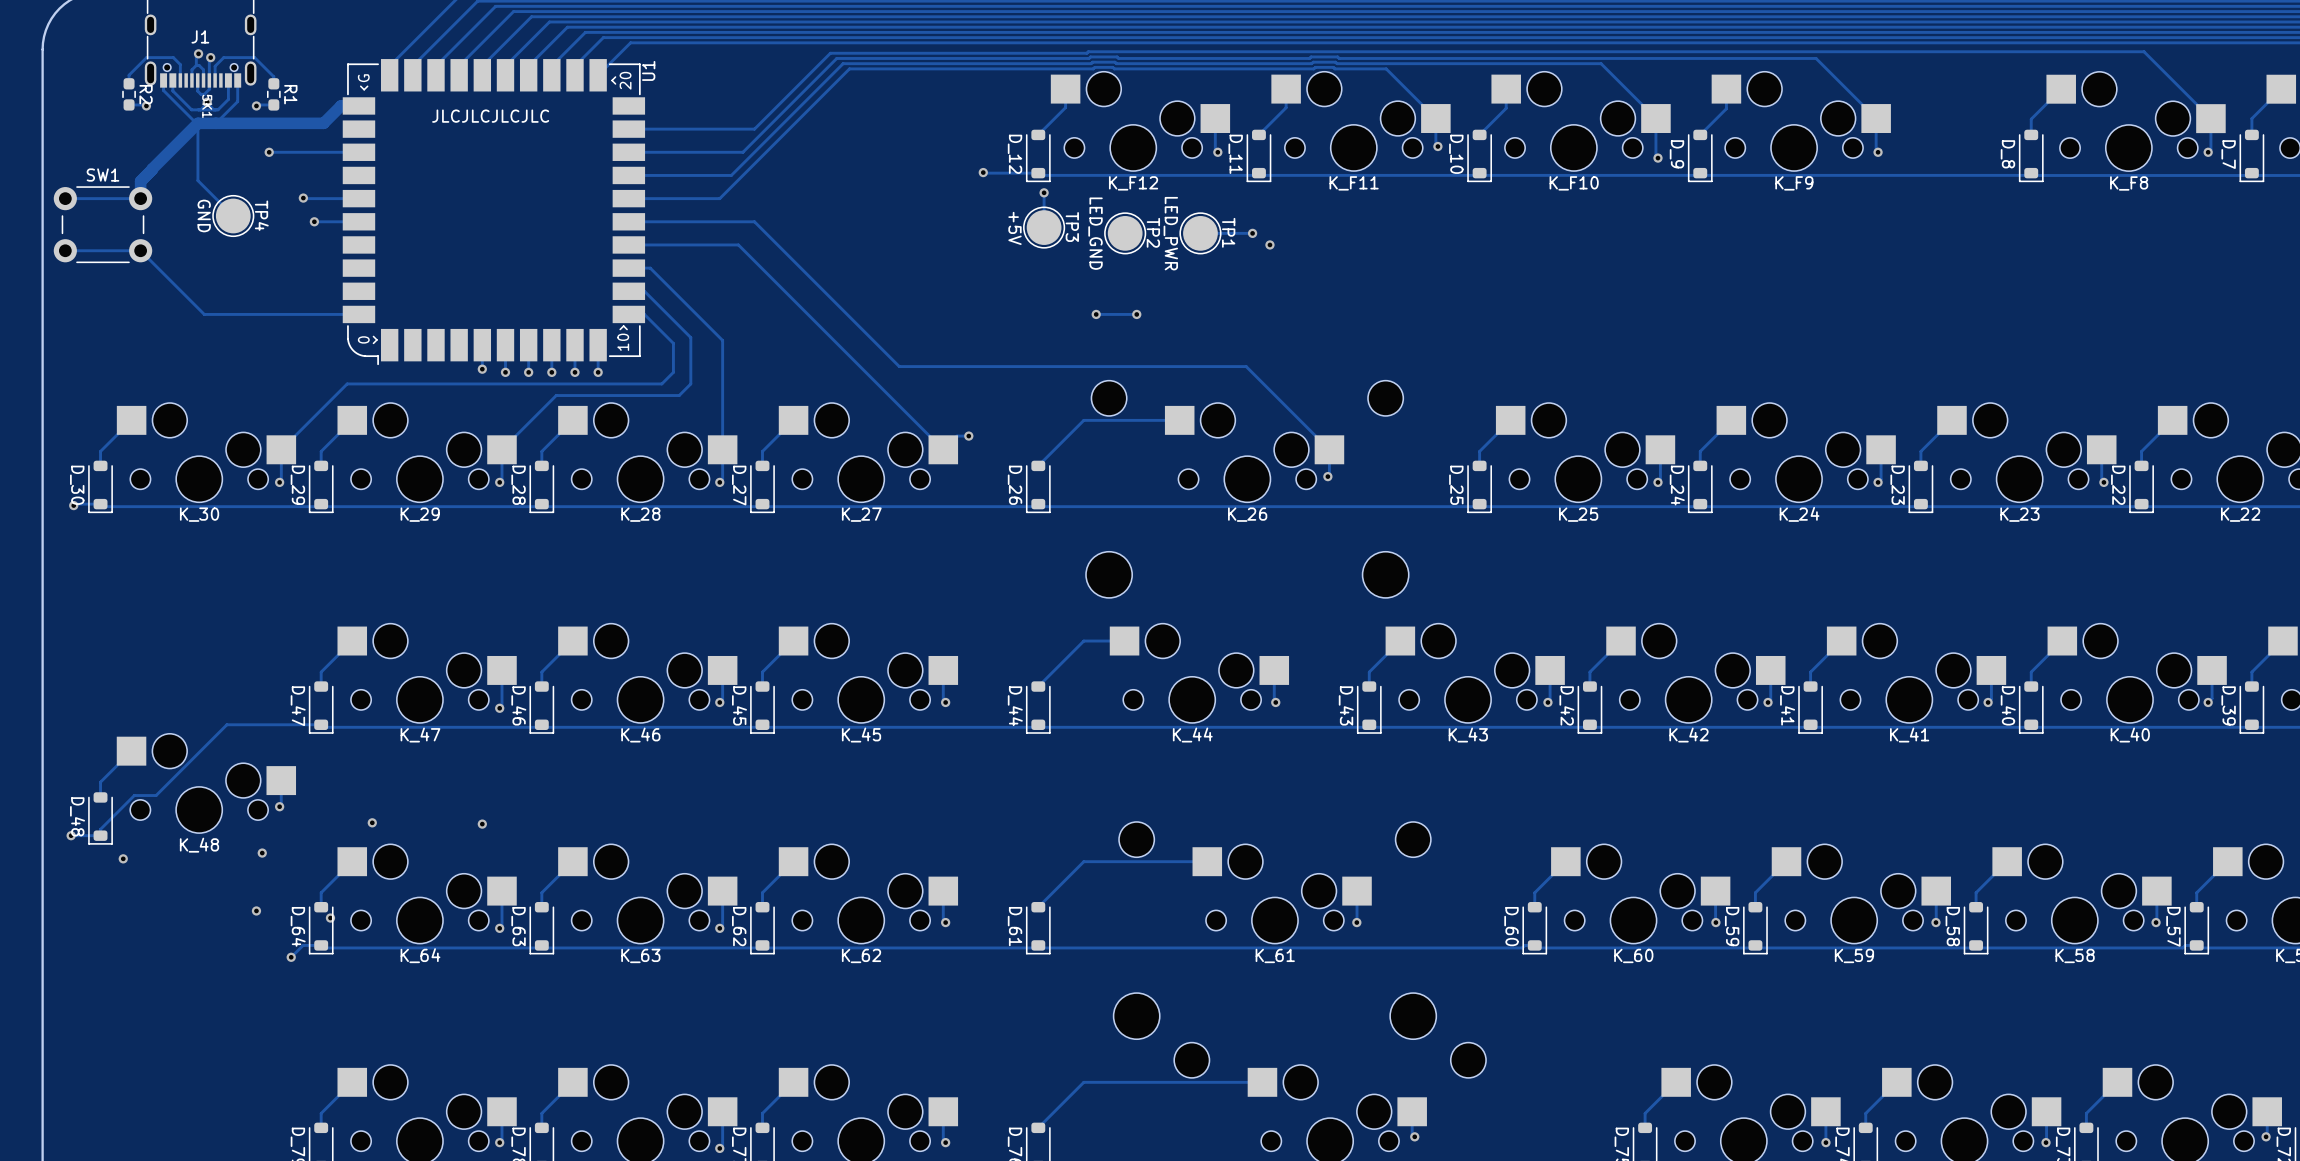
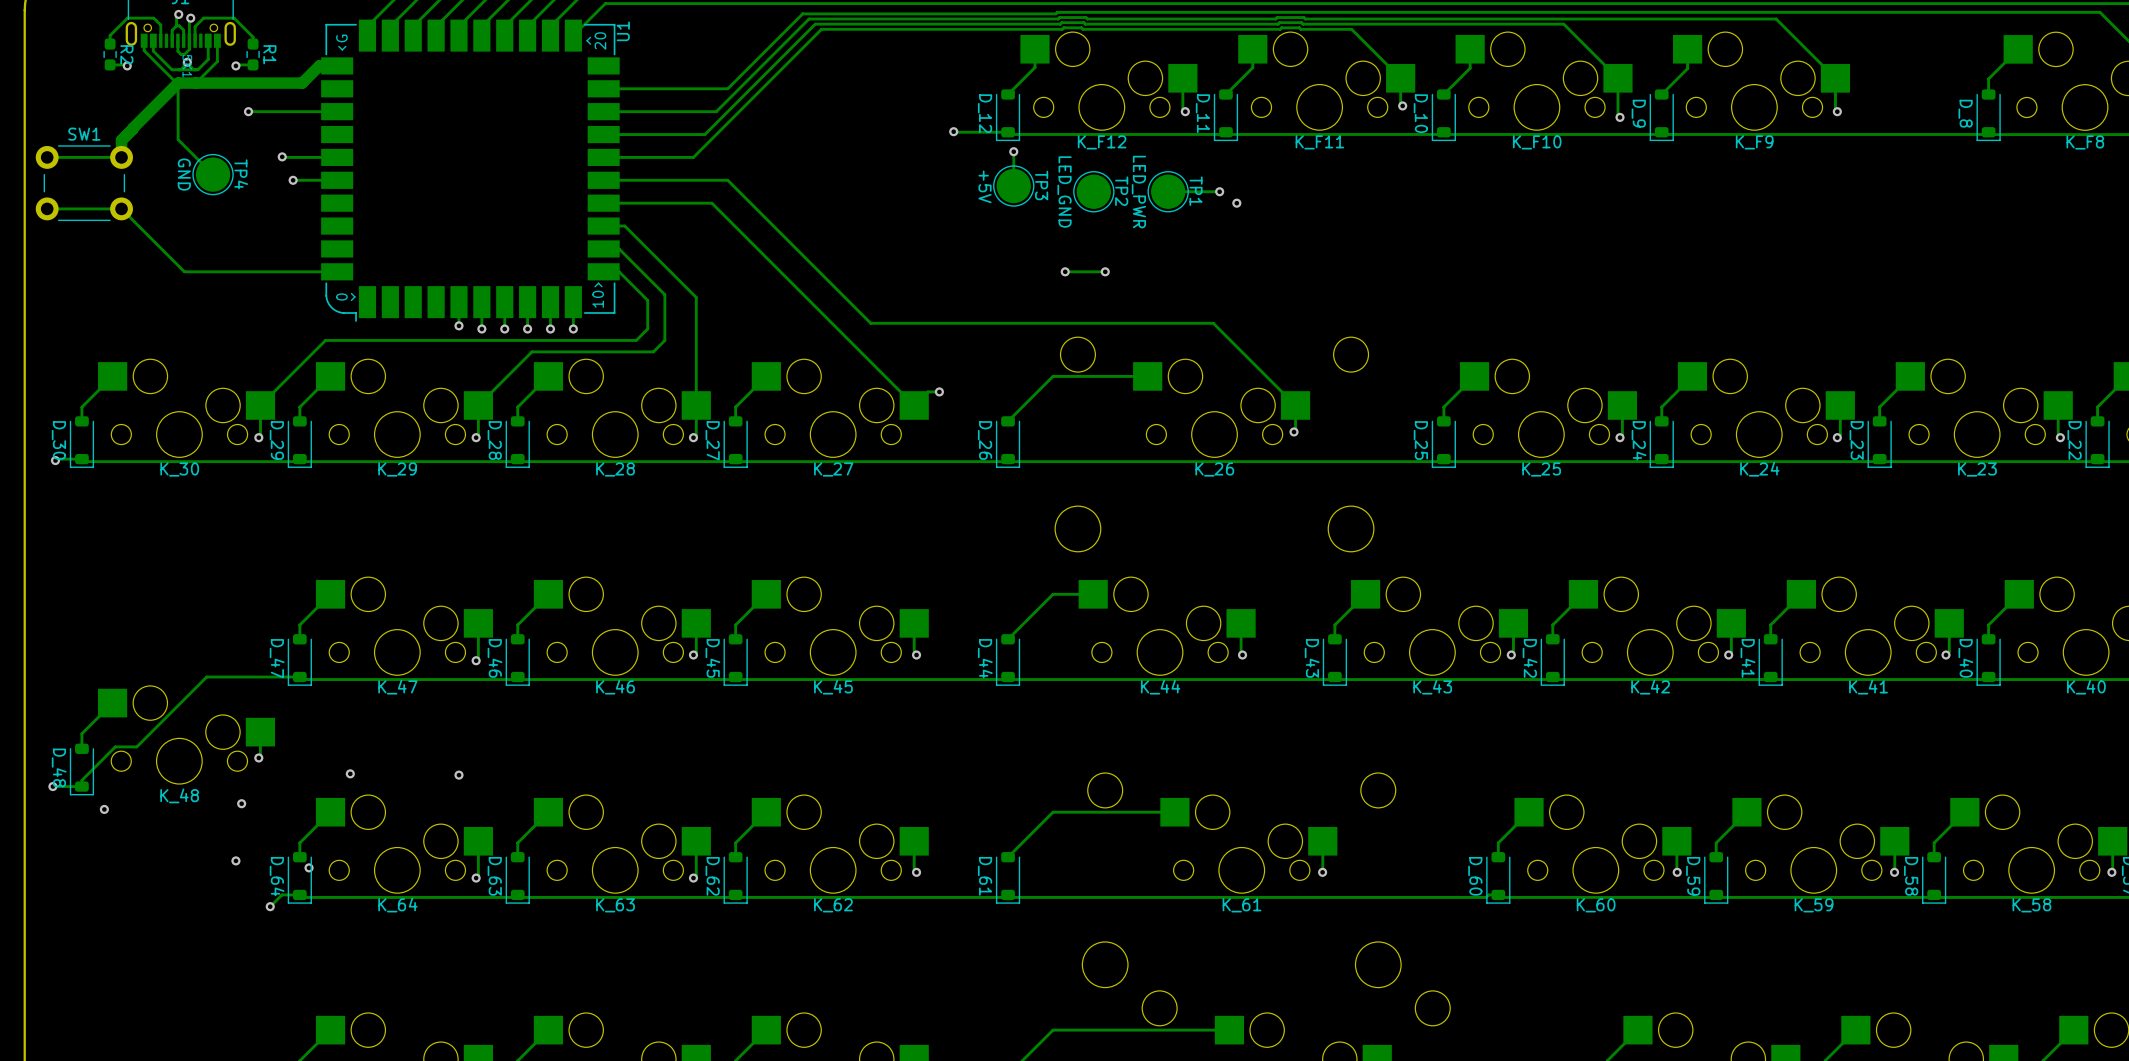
text: JLCJLCJLCJLC (490, 116) -> none

